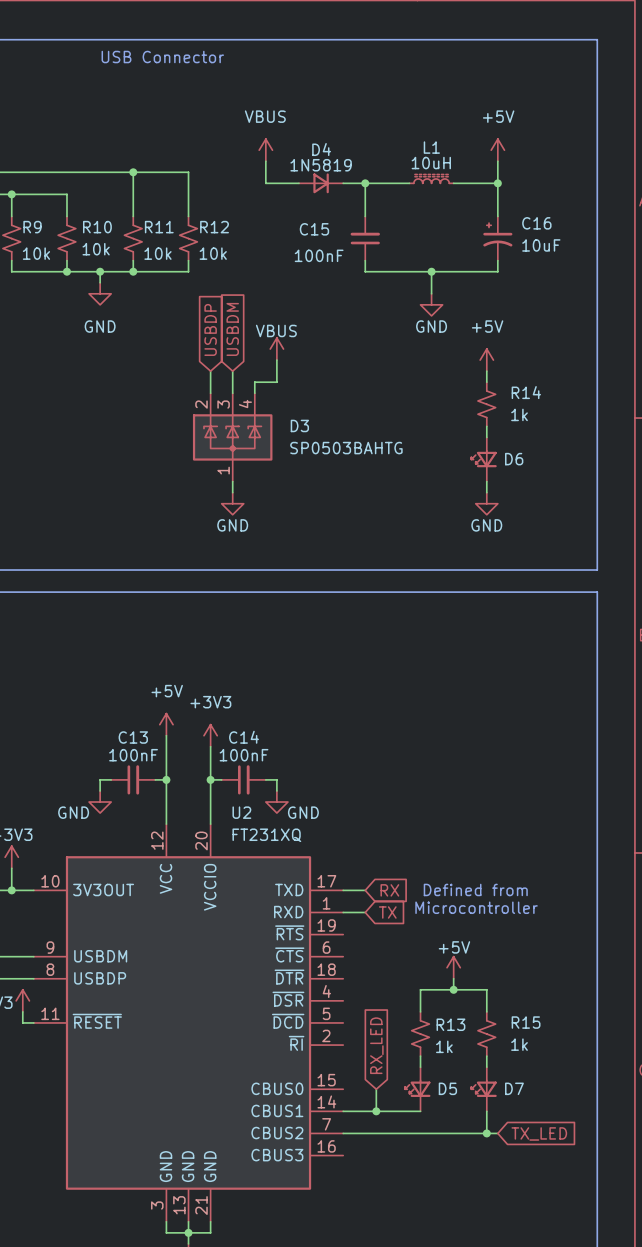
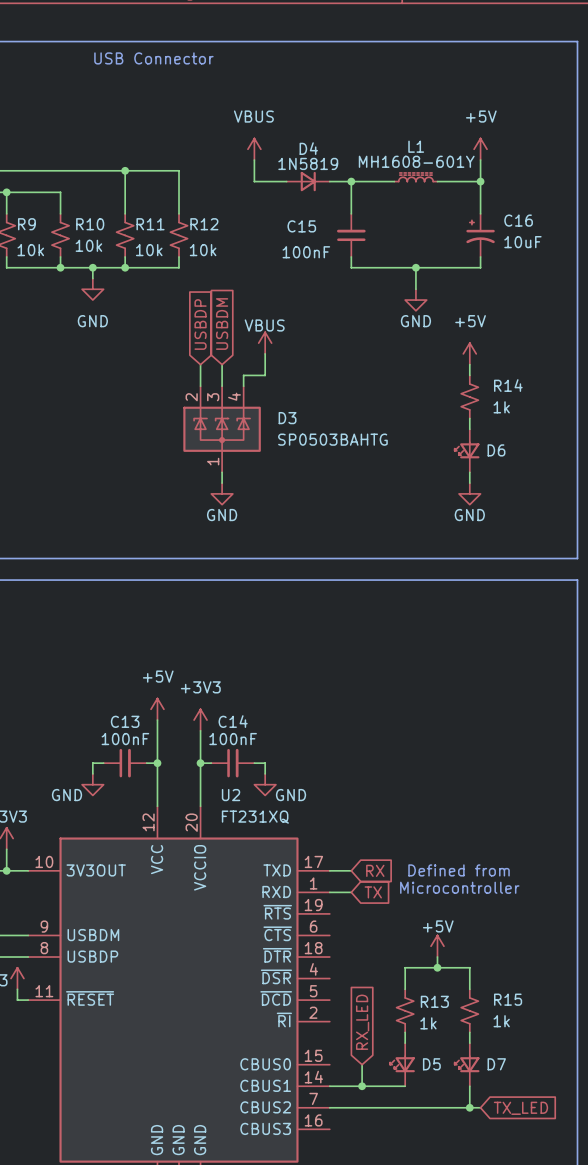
L1 value: 10uH (431, 163) -> MH1608-601Y (416, 161)

